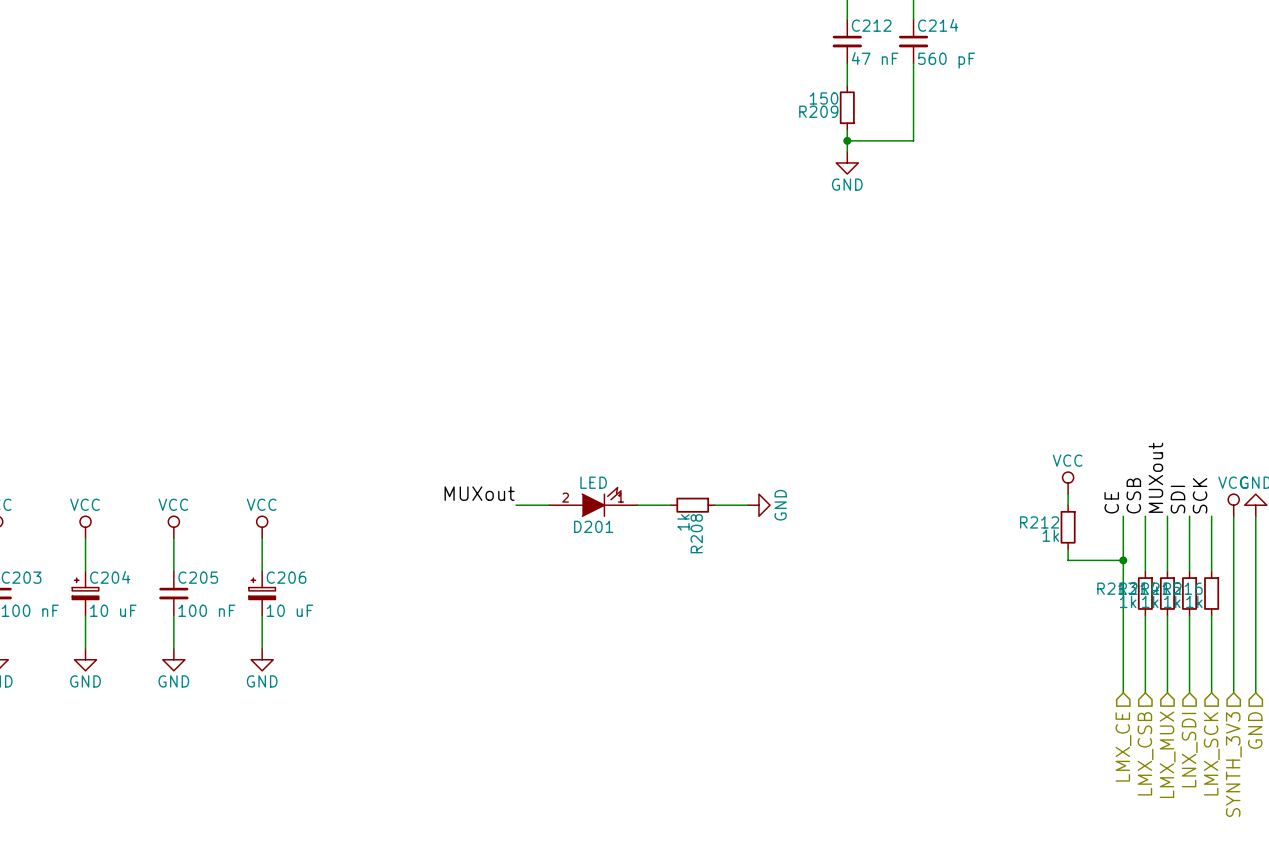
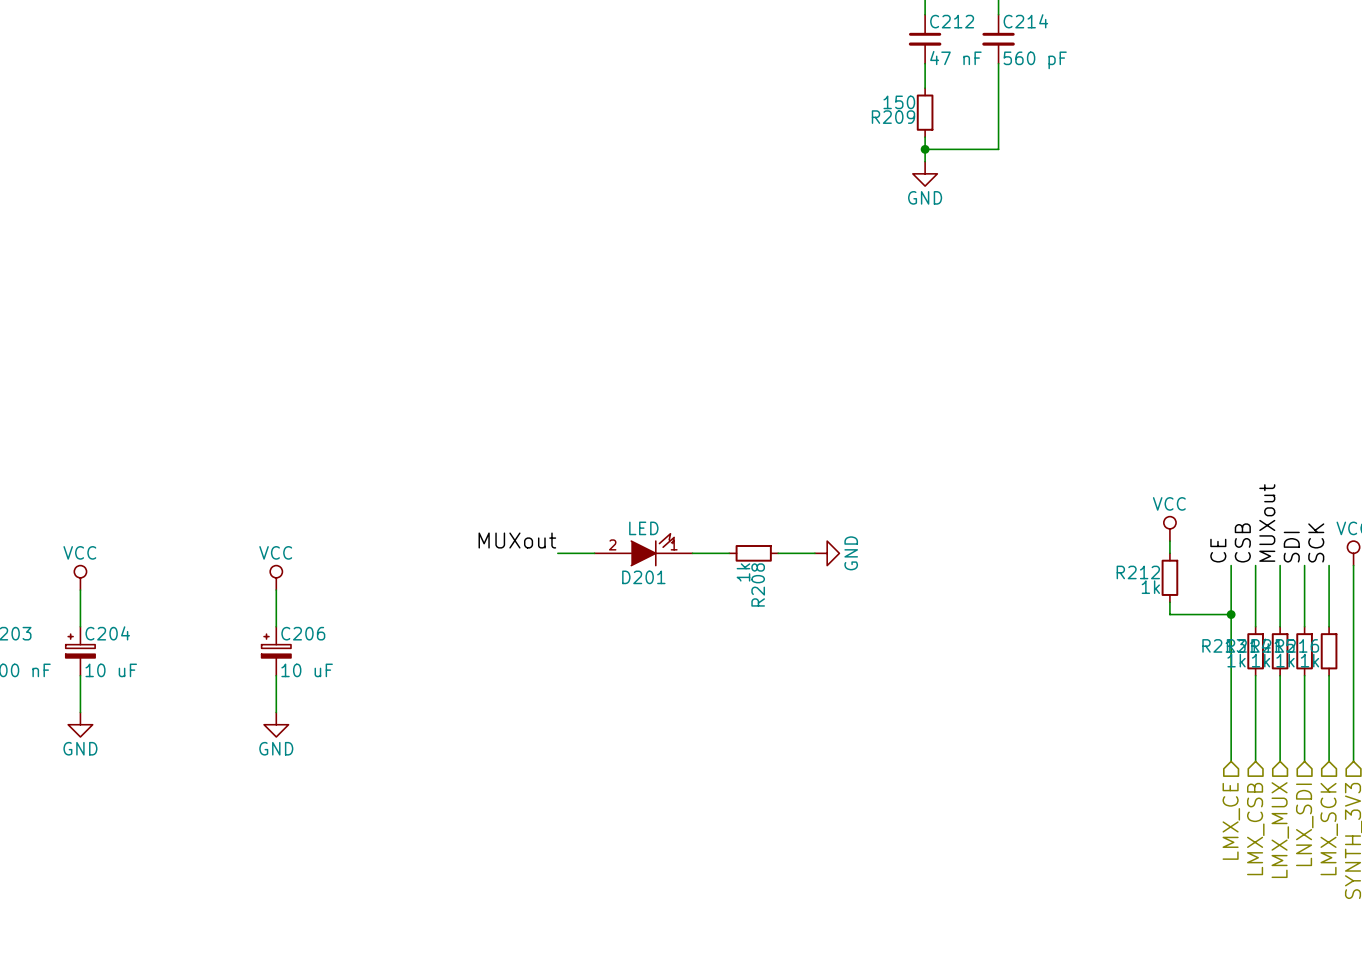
power symbol: VCC (173, 527) -> none
wire: (173, 538) (173, 571) -> none
C205: 100 nF (173, 593) -> none
wire: (173, 615) (173, 648) -> none
power symbol: GND (173, 659) -> none

